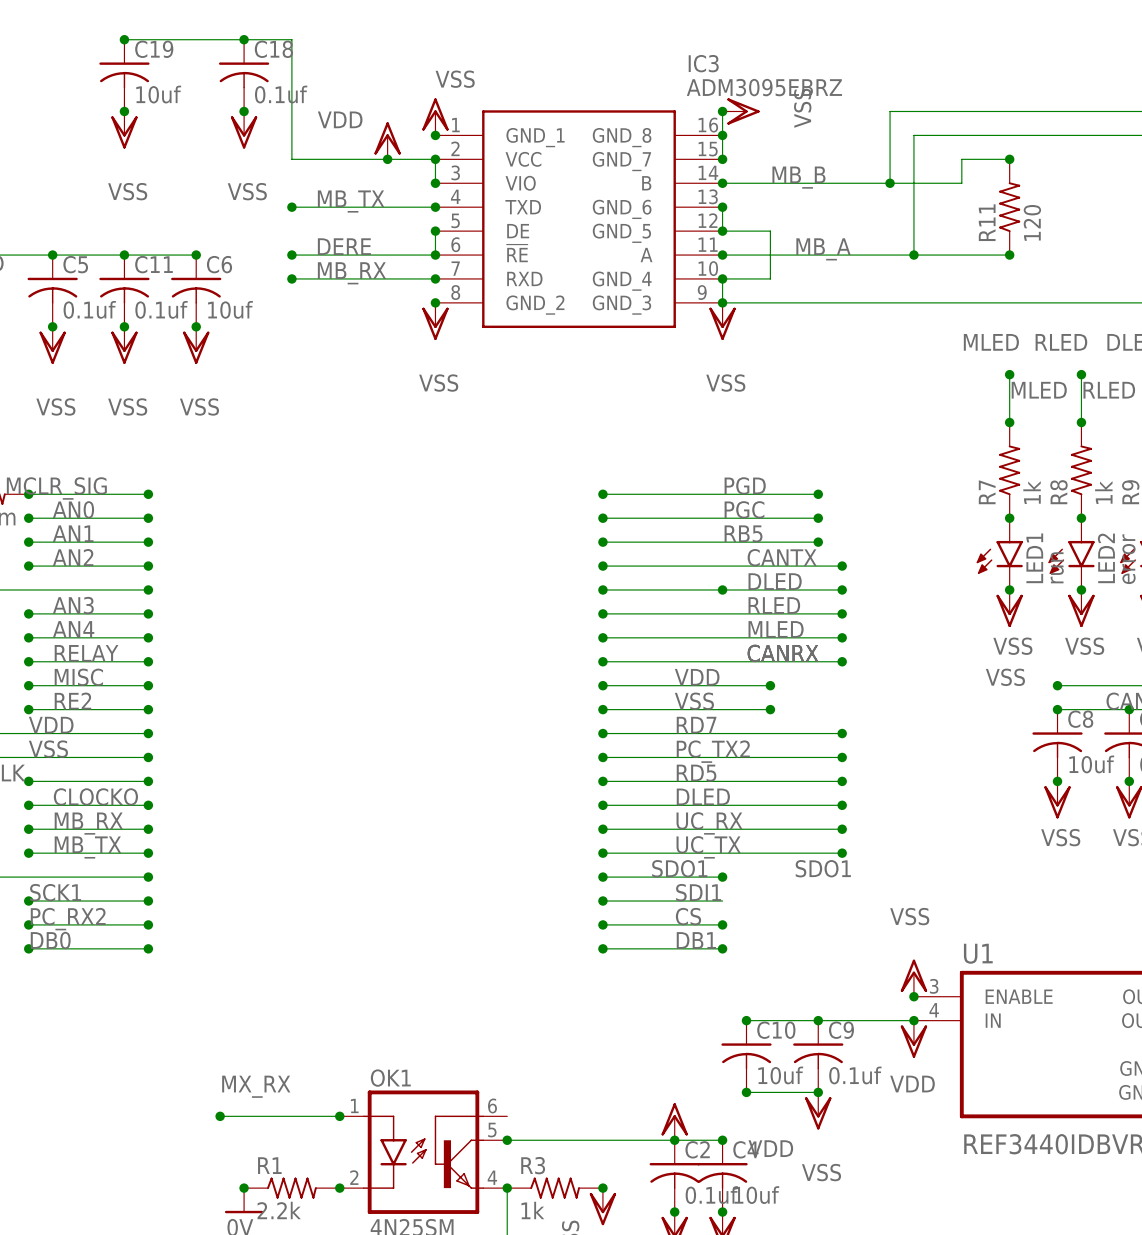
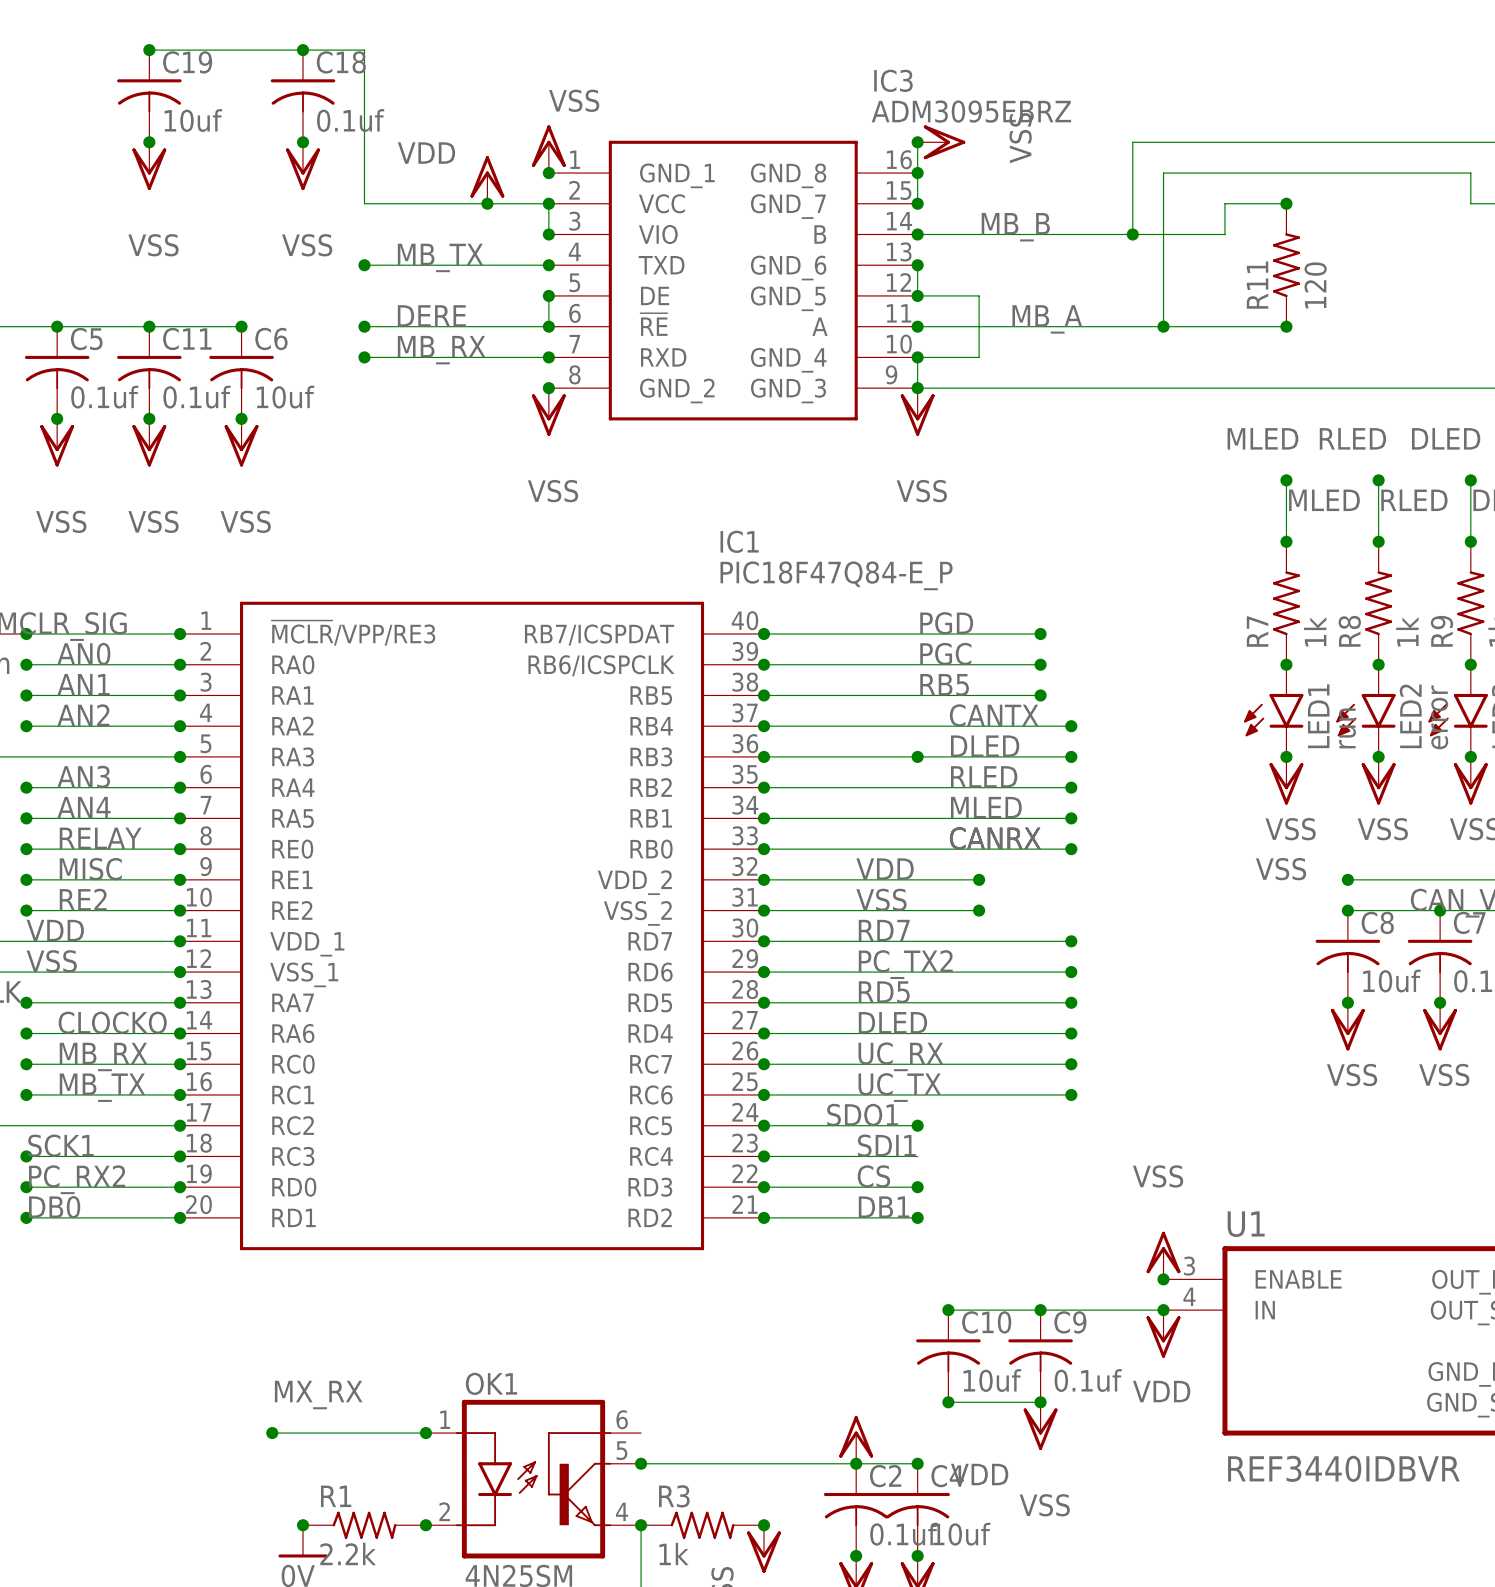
IC1: none -> PIC18F47Q84-E_P (472, 925)
label: SDO1 (823, 868) -> none

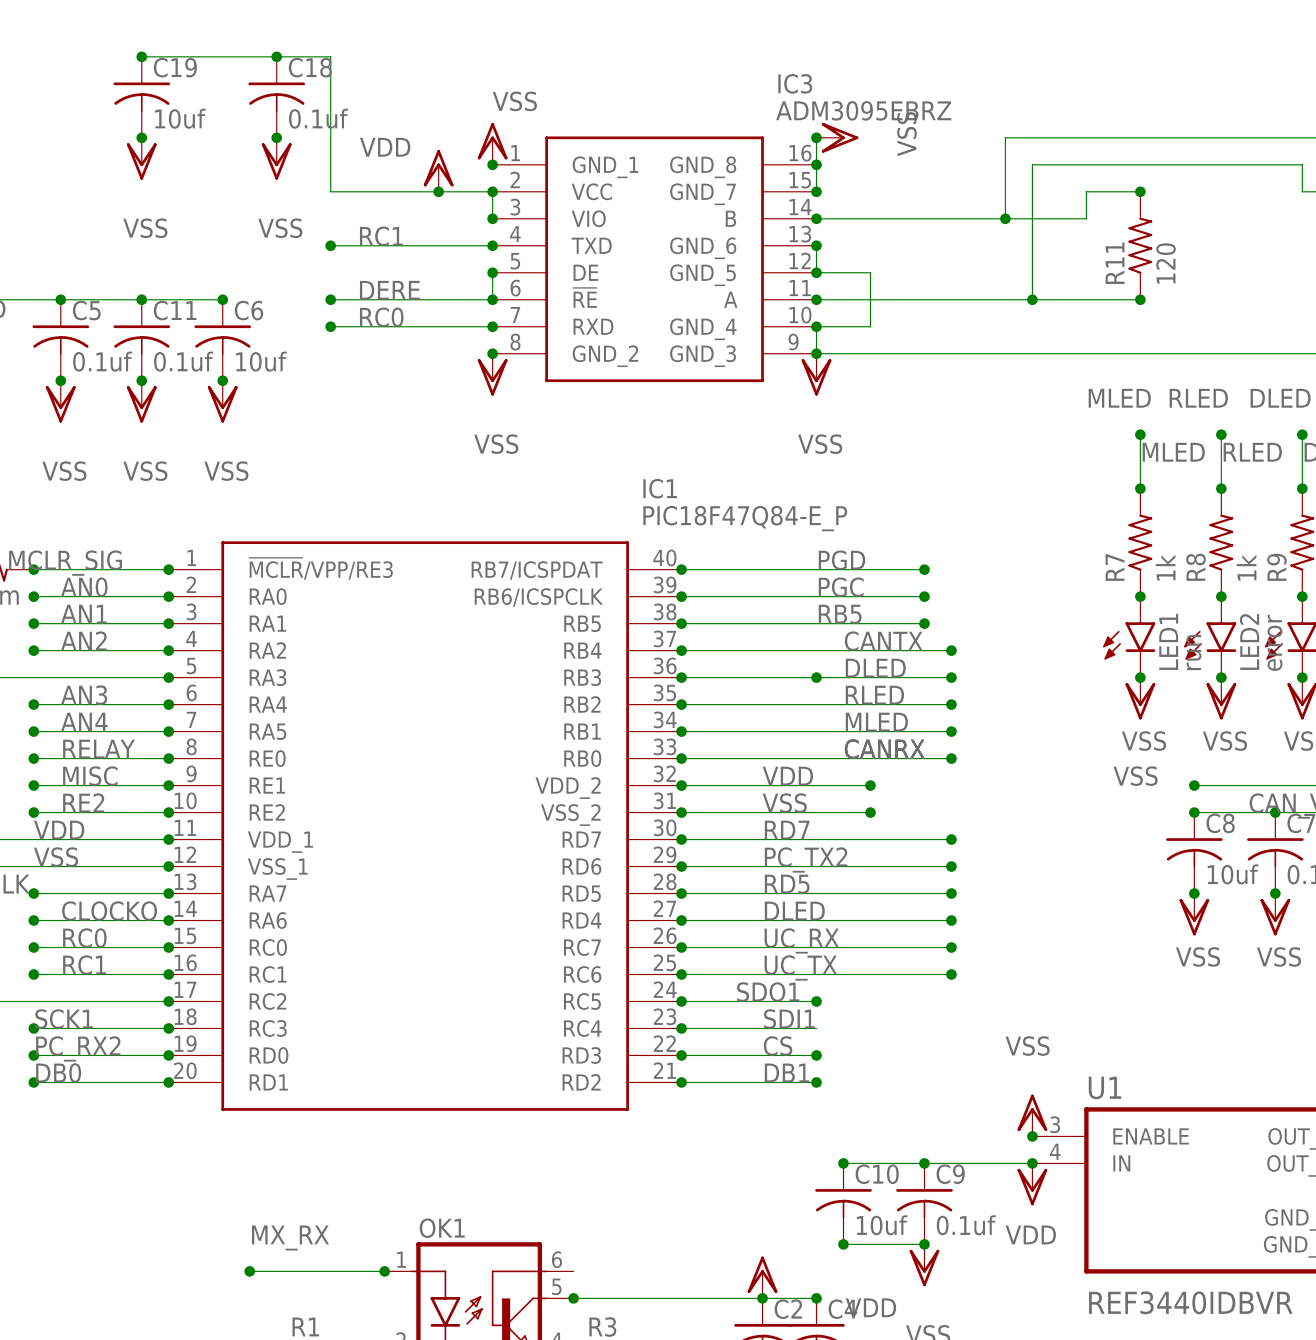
label: MB_B (1015, 227) -> none
label: MB_TX (440, 257) -> RC1 (381, 236)
label: MB_A (1047, 319) -> none
label: MB_RX (441, 350) -> RC0 (381, 317)
label: MB_RX (103, 1056) -> RC0 (84, 938)
label: MB_TX (102, 1087) -> RC1 (84, 965)

